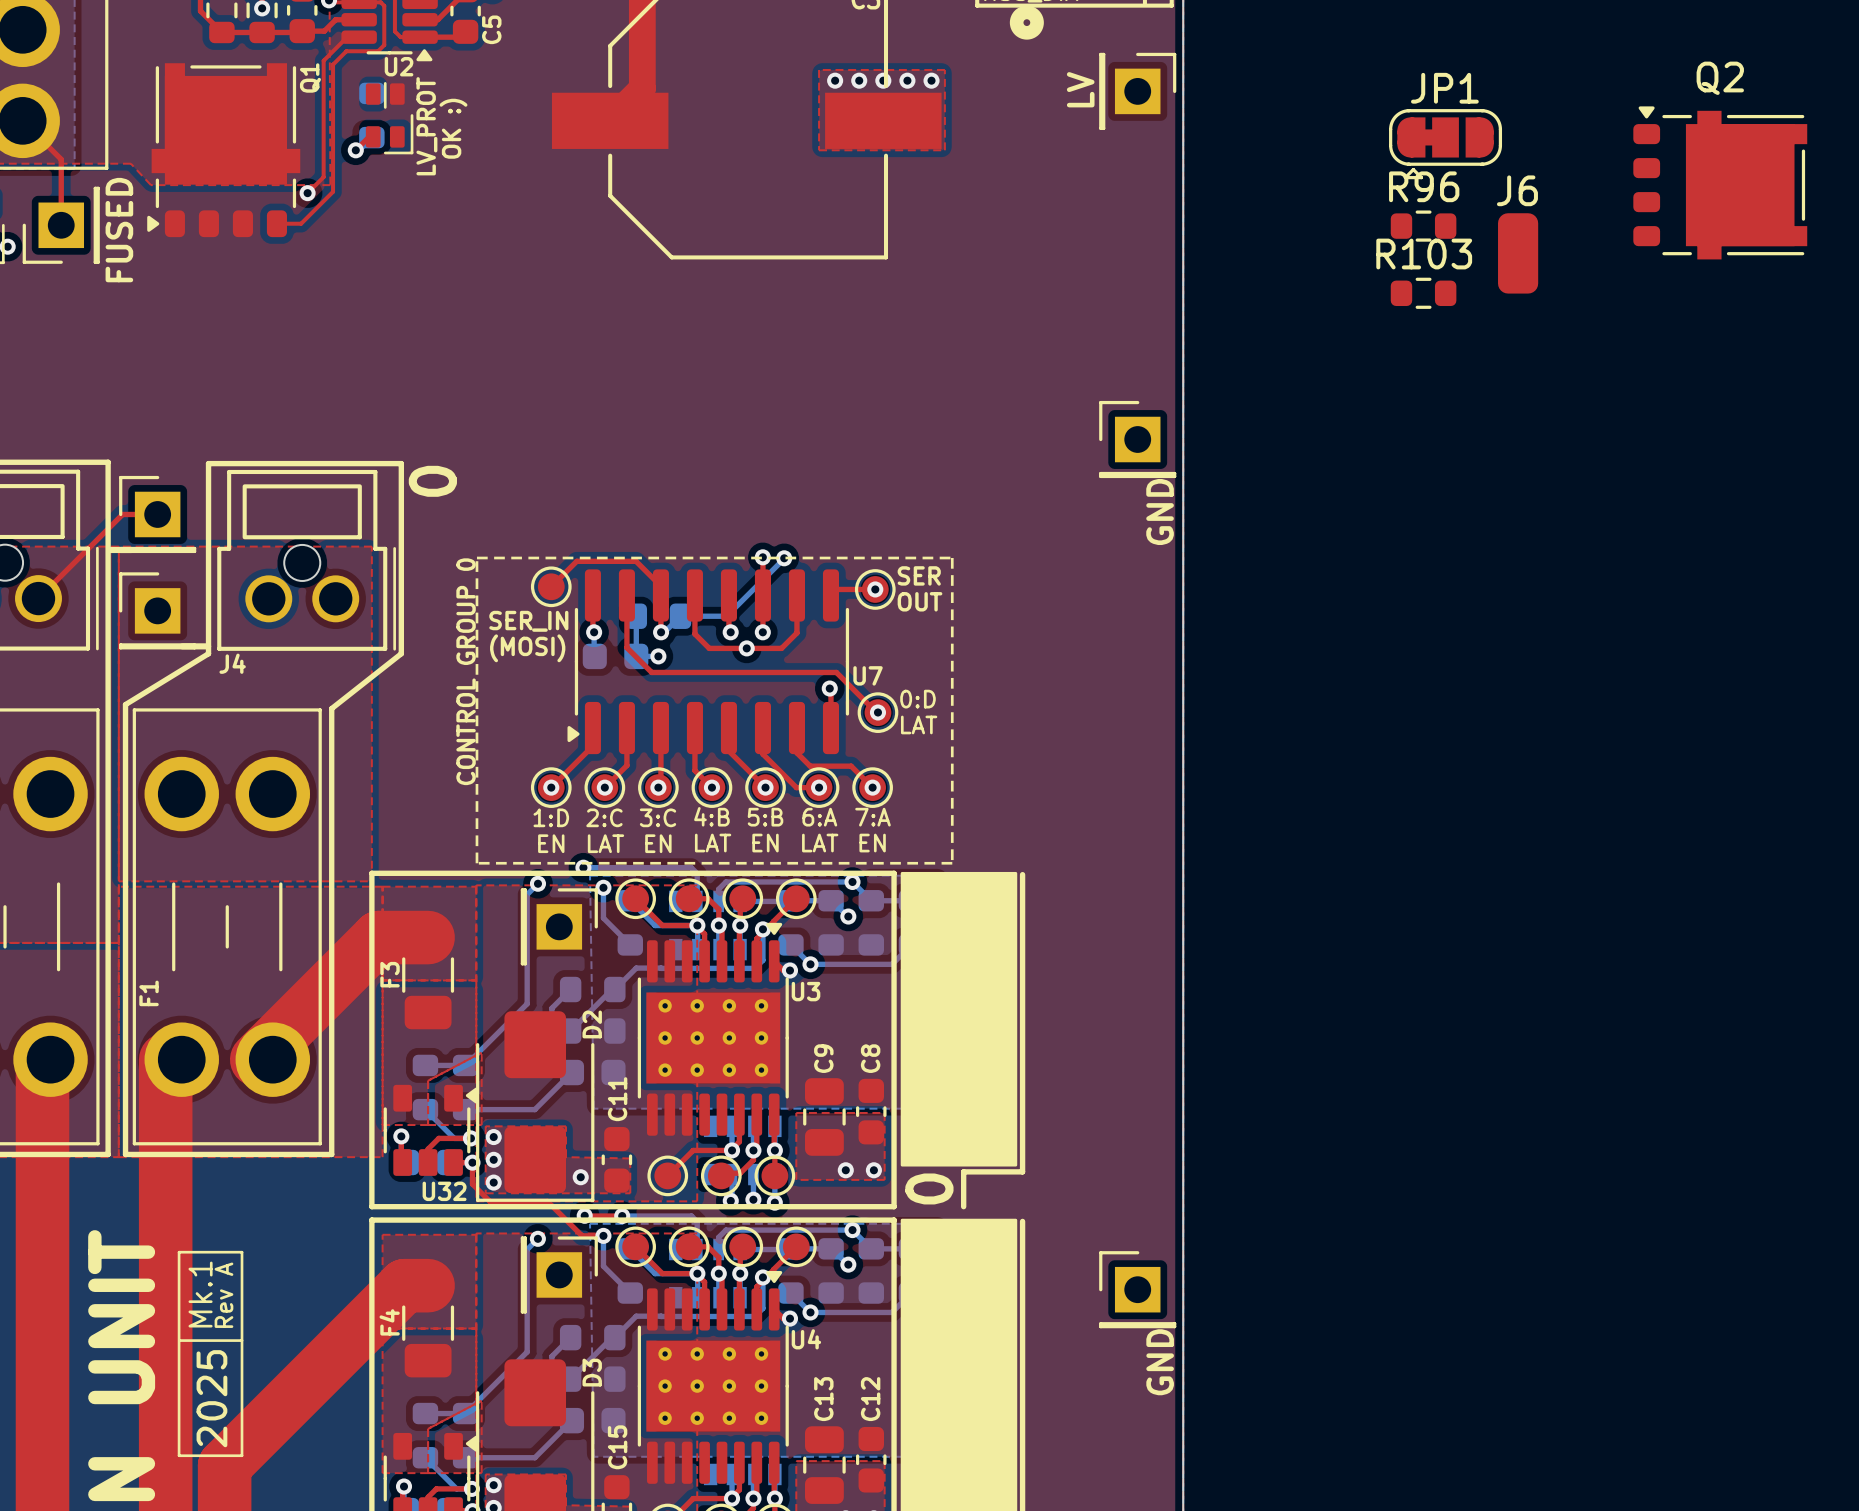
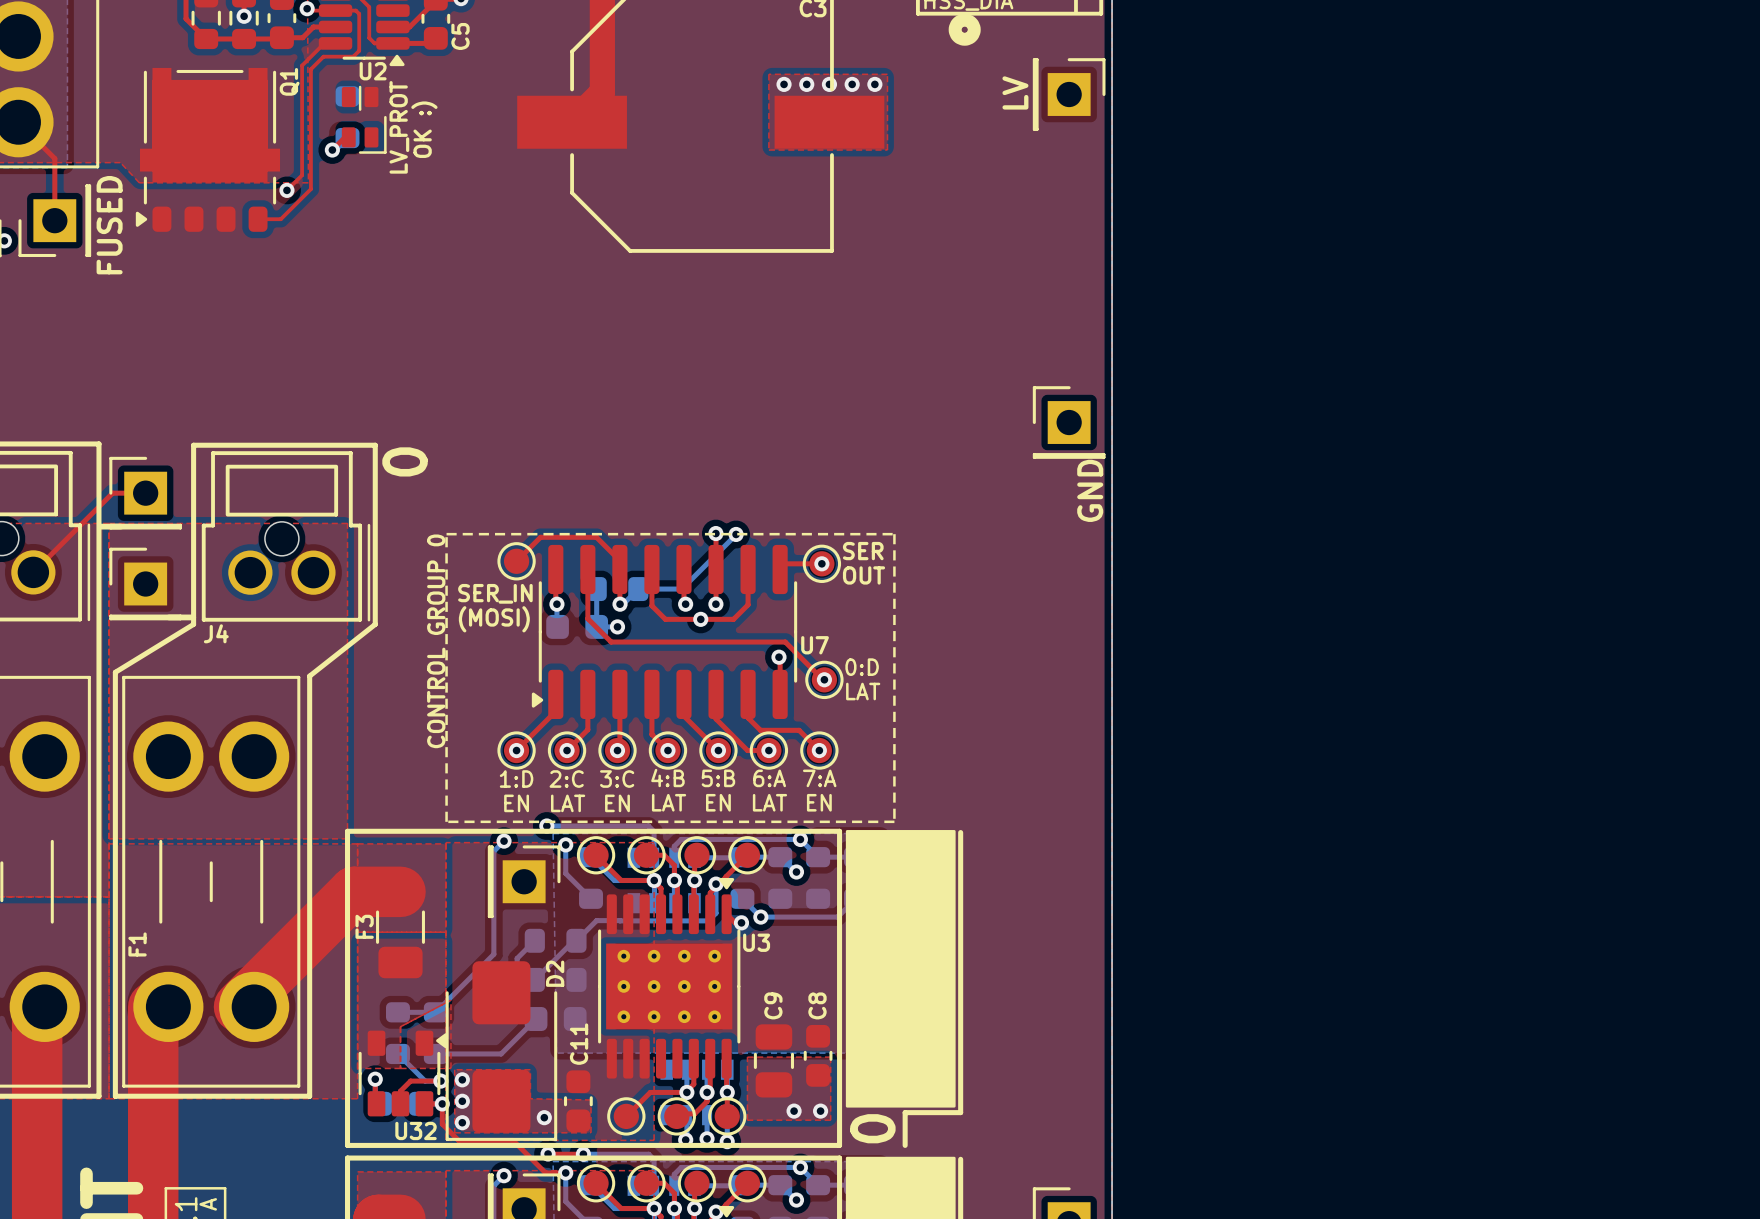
JP1: (1445, 144) -> none
Q2: (1720, 182) -> none
R96: (1423, 226) -> none
J6: (1518, 253) -> none
R103: (1423, 293) -> none

